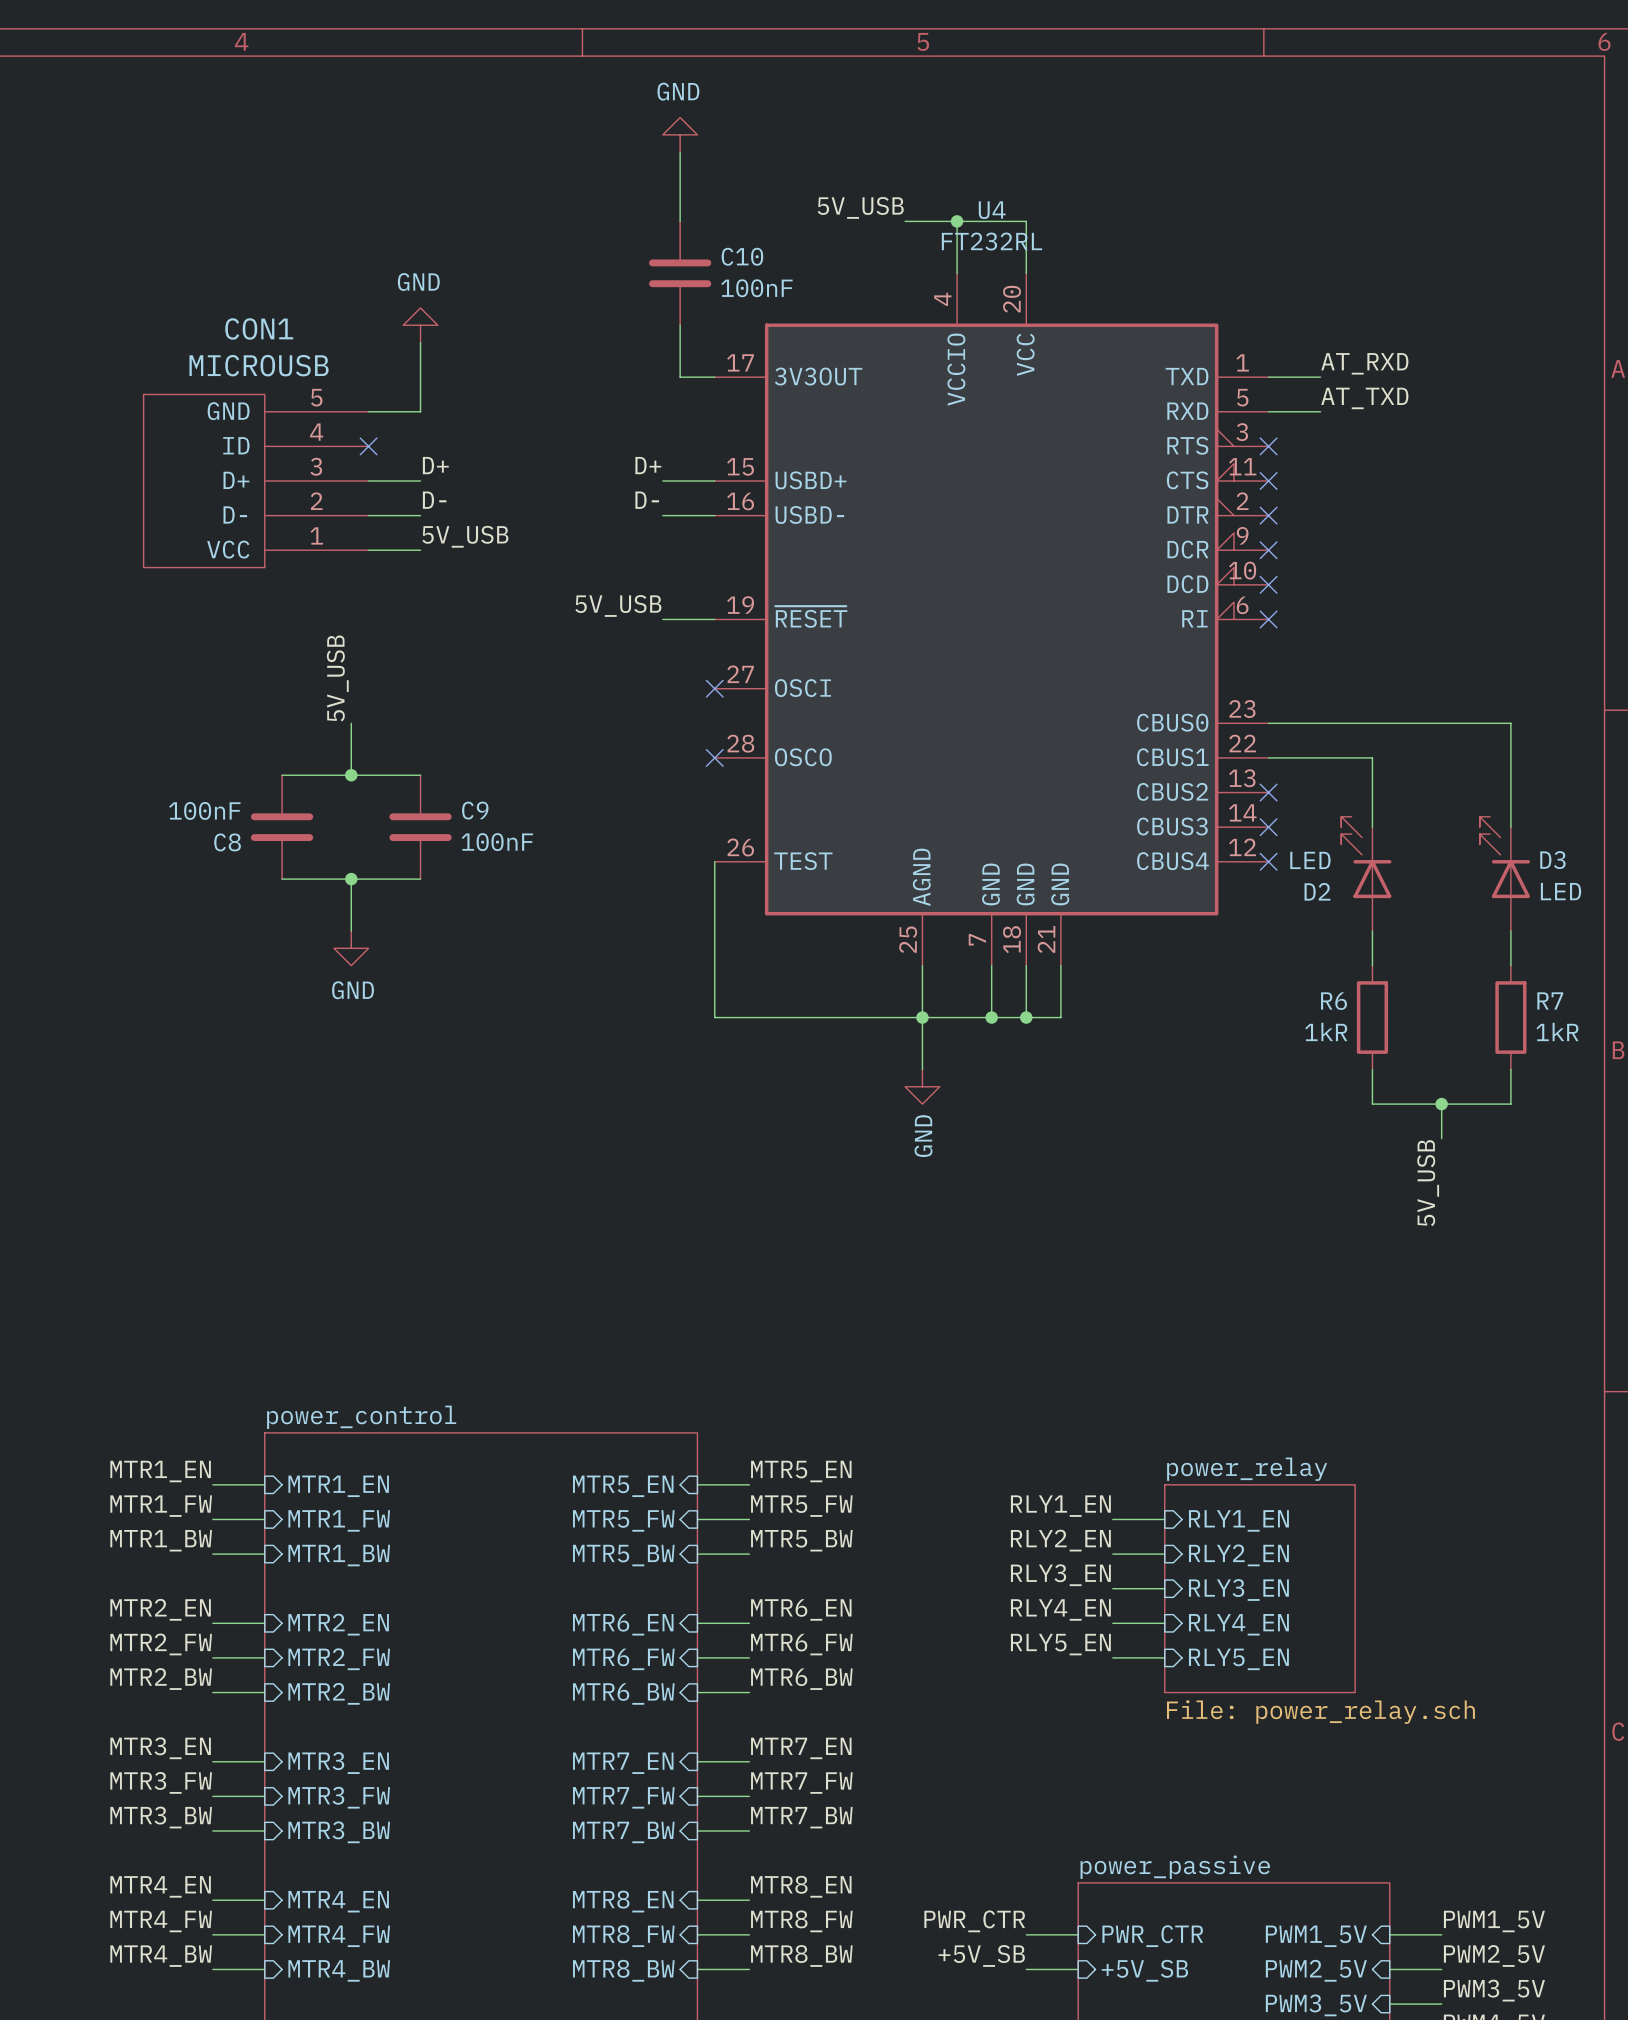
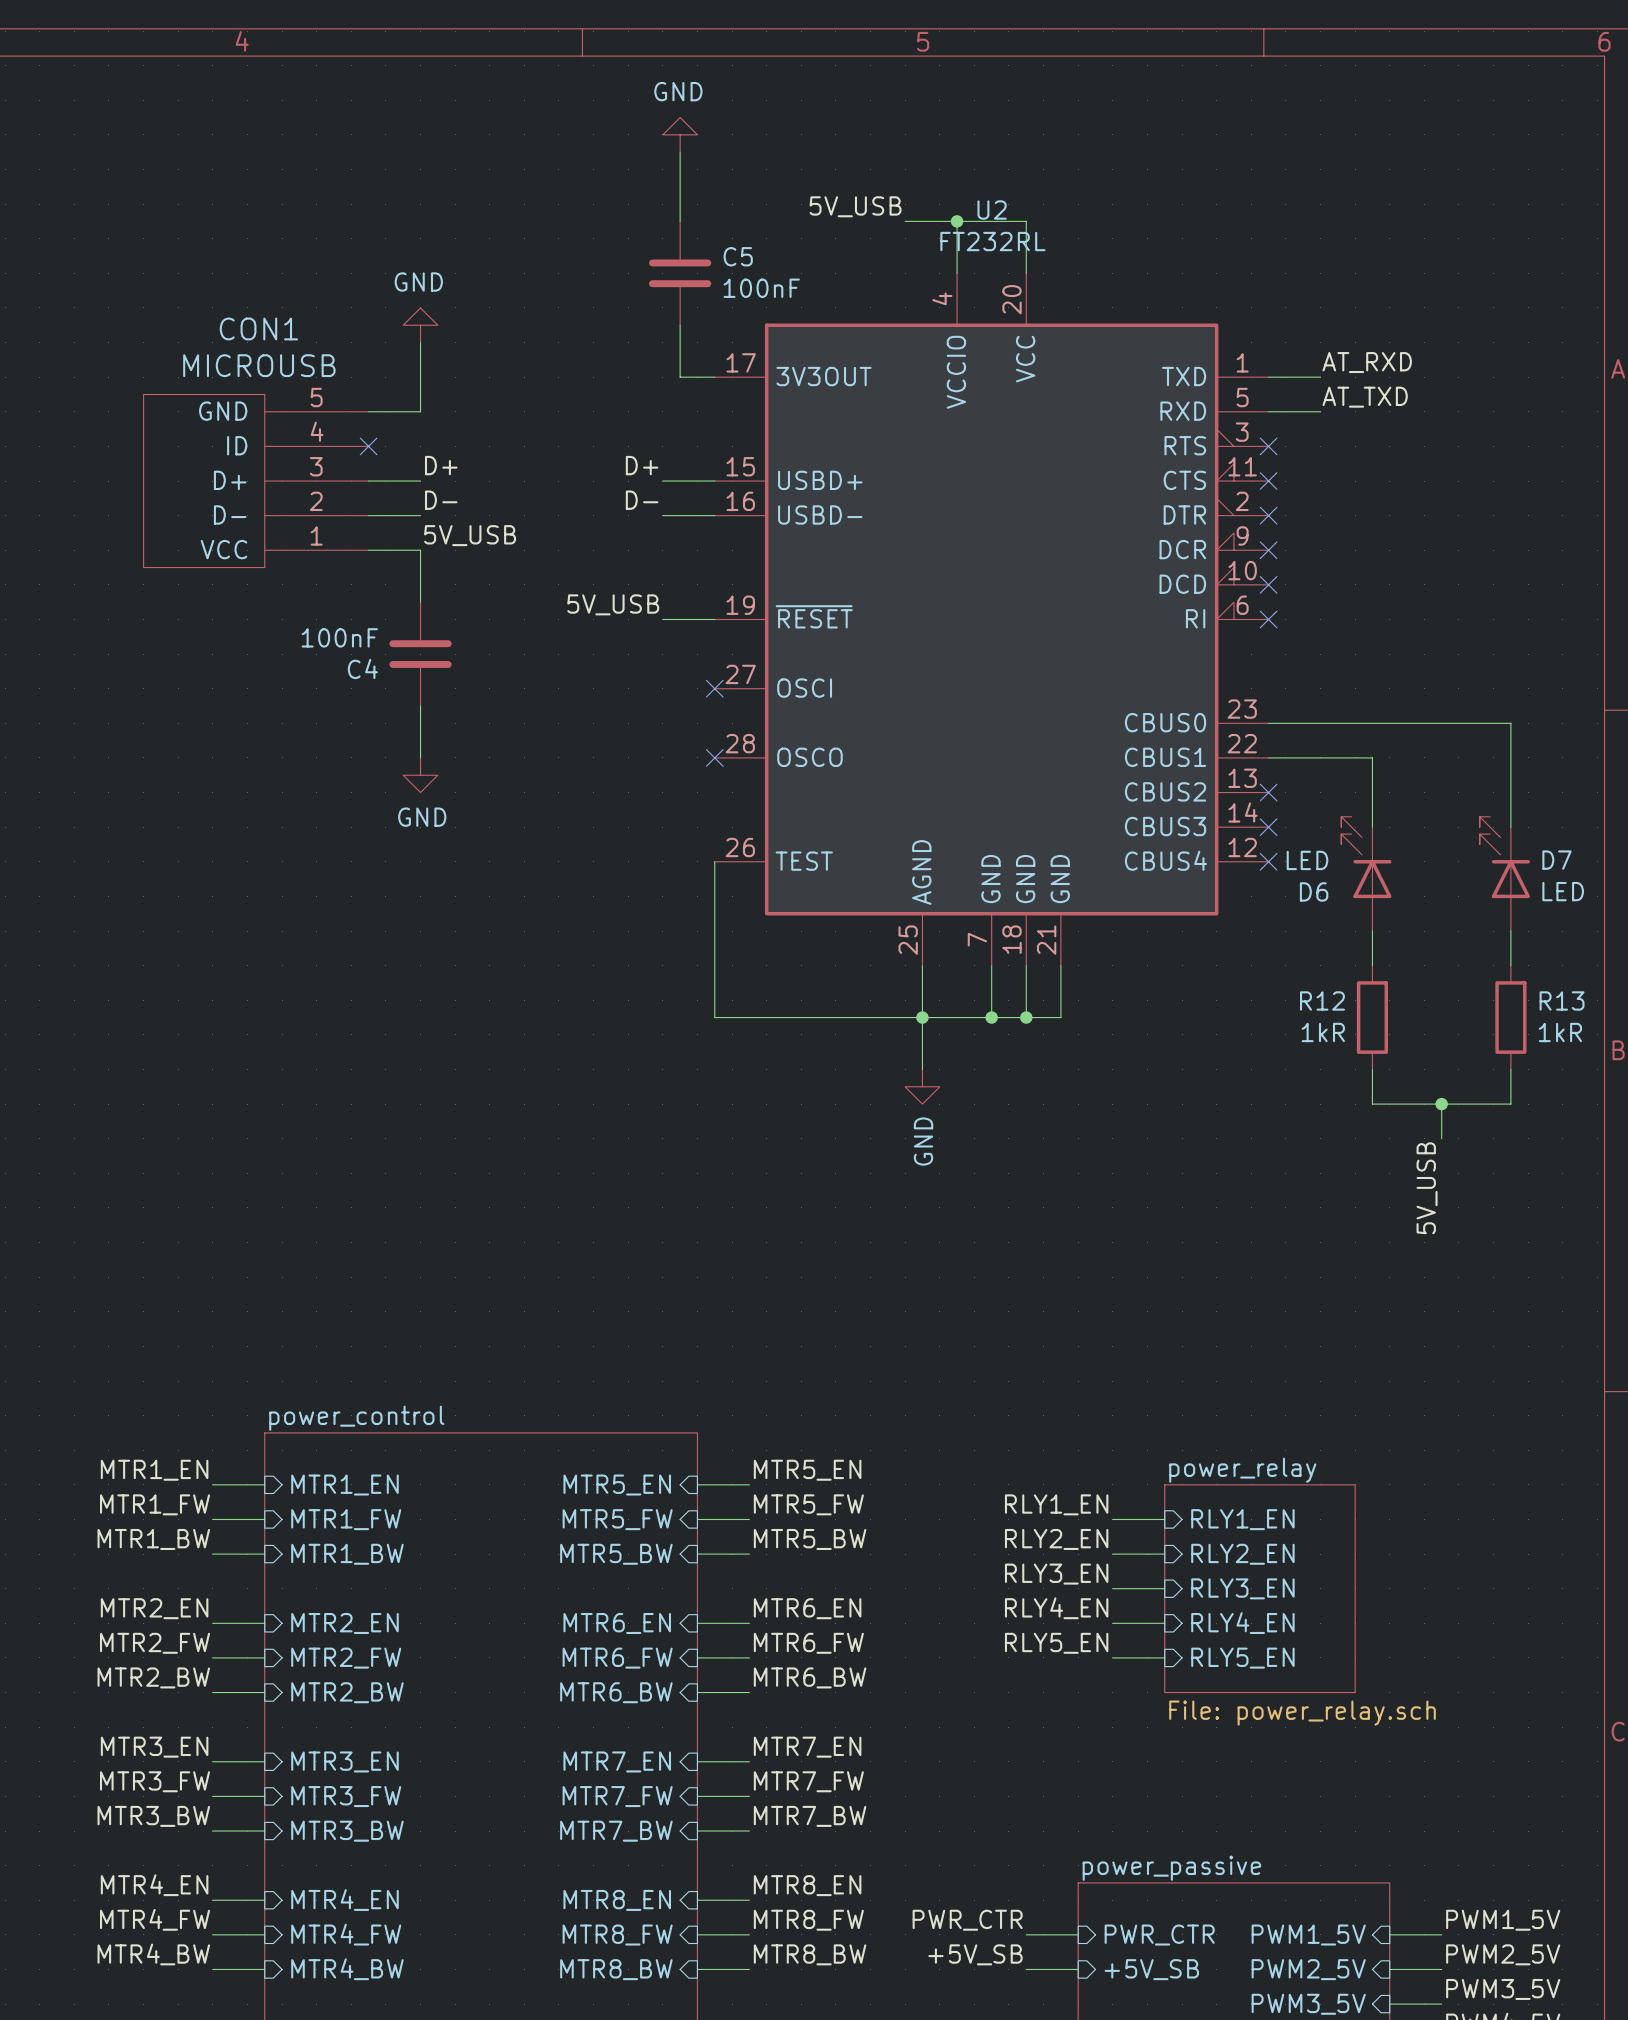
U4 name: U4 (992, 210) -> U2 (992, 210)
C10 name: C10 (742, 256) -> C5 (738, 256)
C4: none -> 100nF (420, 654)
label: 5V_USB (337, 678) -> none
wire: (351, 723) (351, 775) -> (420, 550) (420, 602)
wire: (282, 775) (420, 775) -> none
junction: (351, 775) -> none
C8: 100nF (282, 827) -> none
C9: 100nF (420, 827) -> none
D3 name: D3 (1552, 860) -> D7 (1556, 860)
wire: (282, 879) (420, 879) -> none
wire: (351, 879) (351, 931) -> (420, 706) (420, 757)
junction: (351, 879) -> none
D2 name: D2 (1317, 891) -> D6 (1314, 891)
power symbol position: GND (351, 948) -> GND (420, 775)
R7 name: R7 (1550, 1000) -> R13 (1562, 1000)
R6 name: R6 (1334, 1001) -> R12 (1322, 1000)

